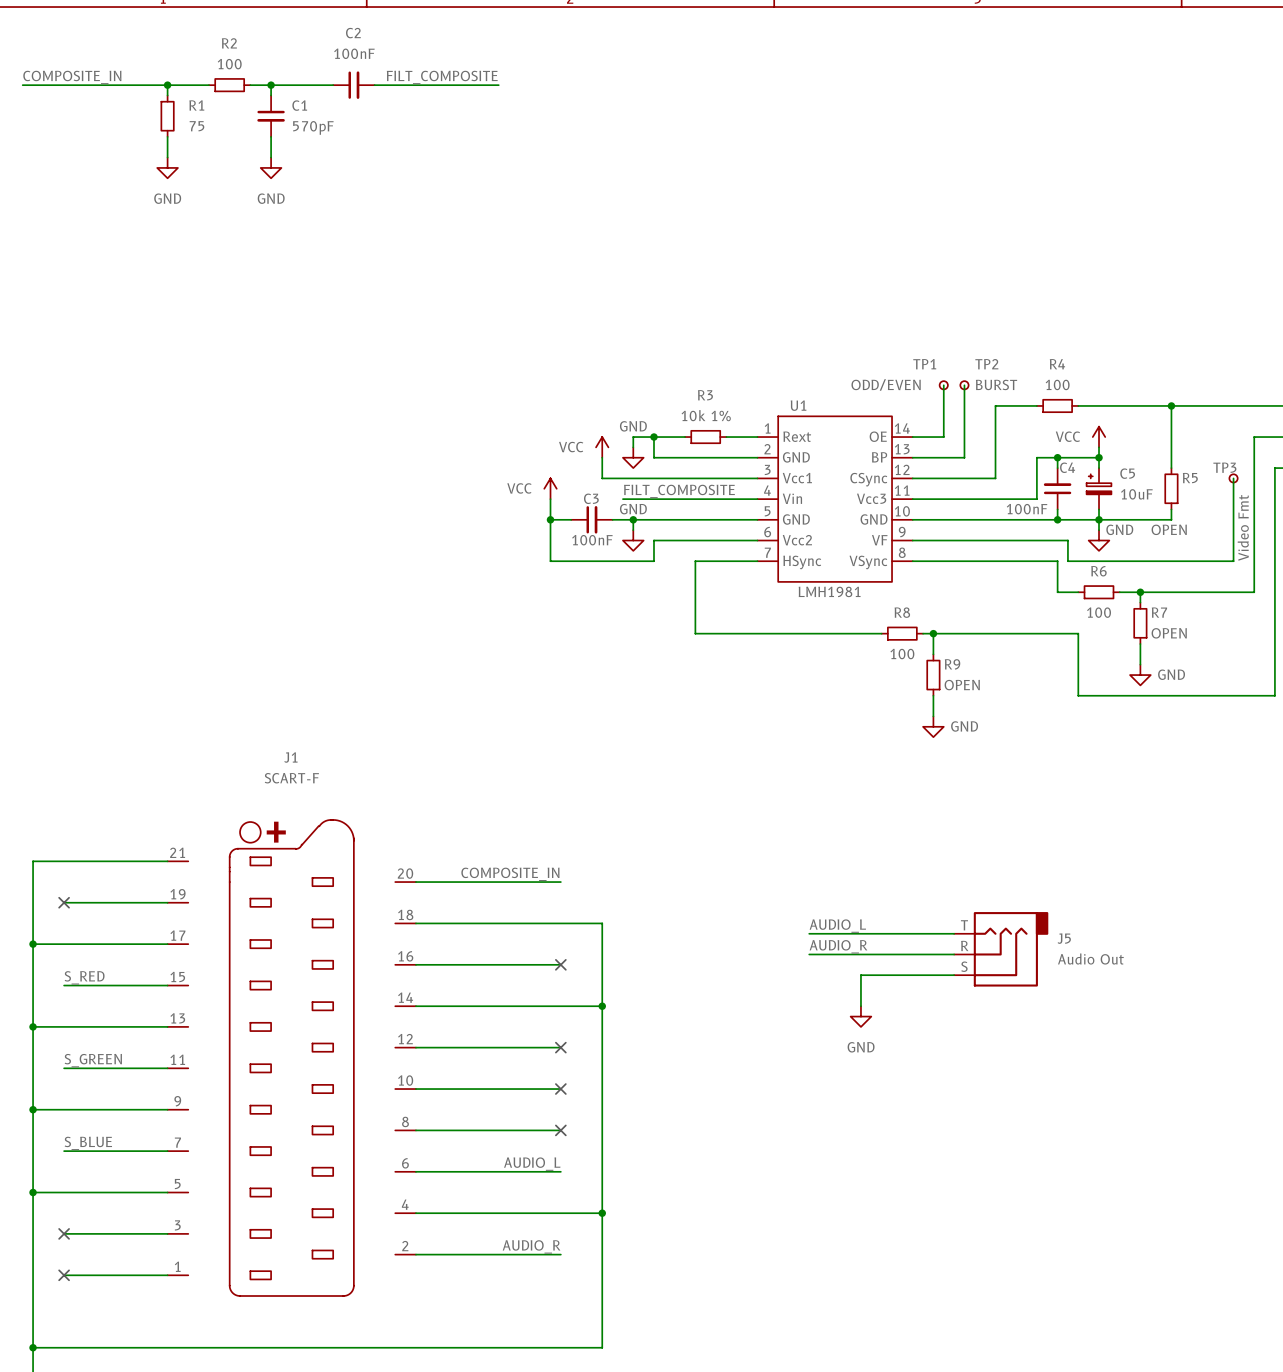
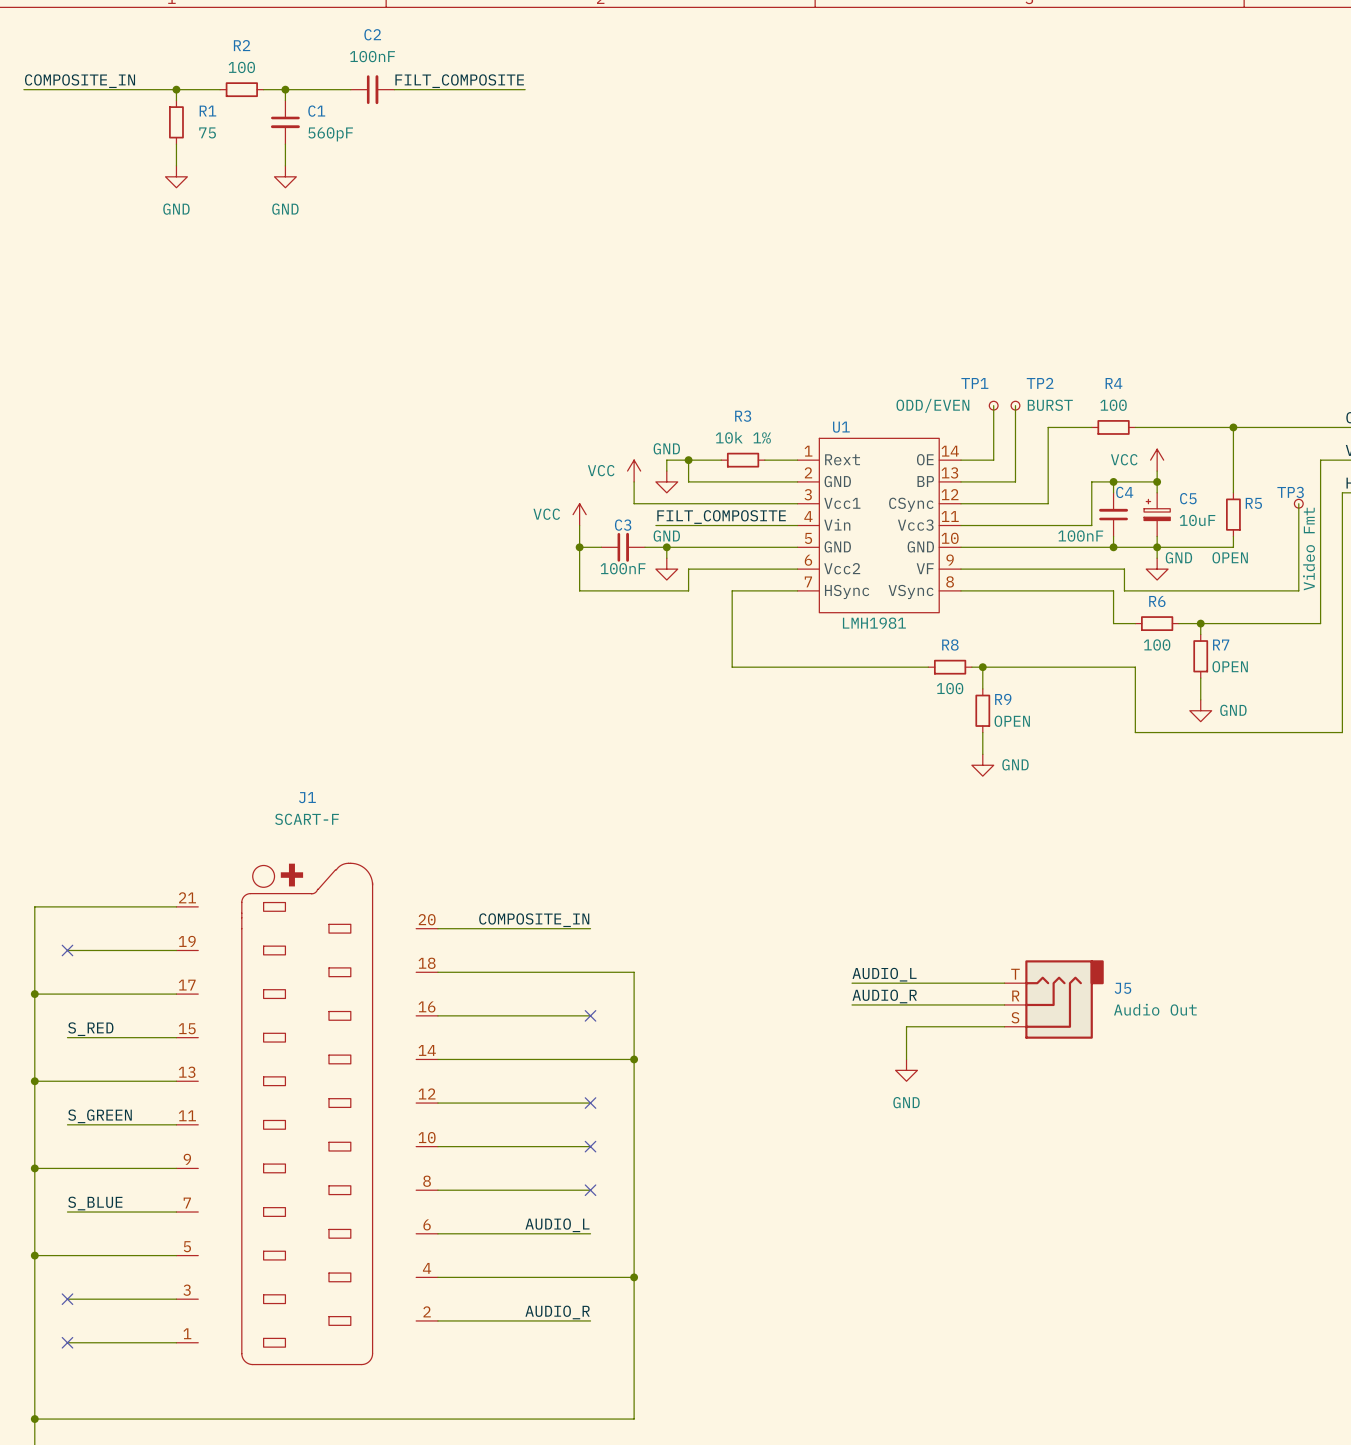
C1 value: 570pF (313, 127) -> 560pF (330, 134)

